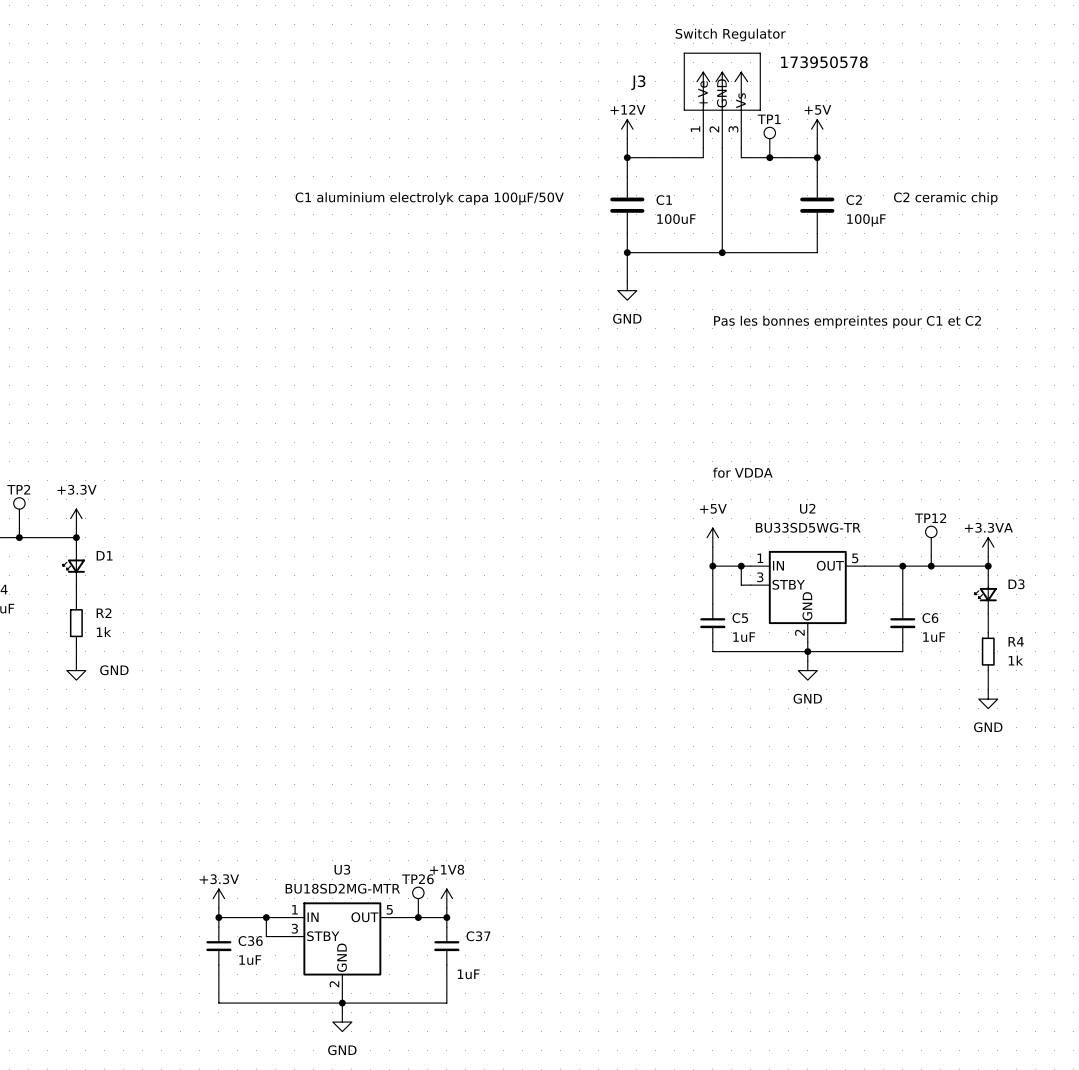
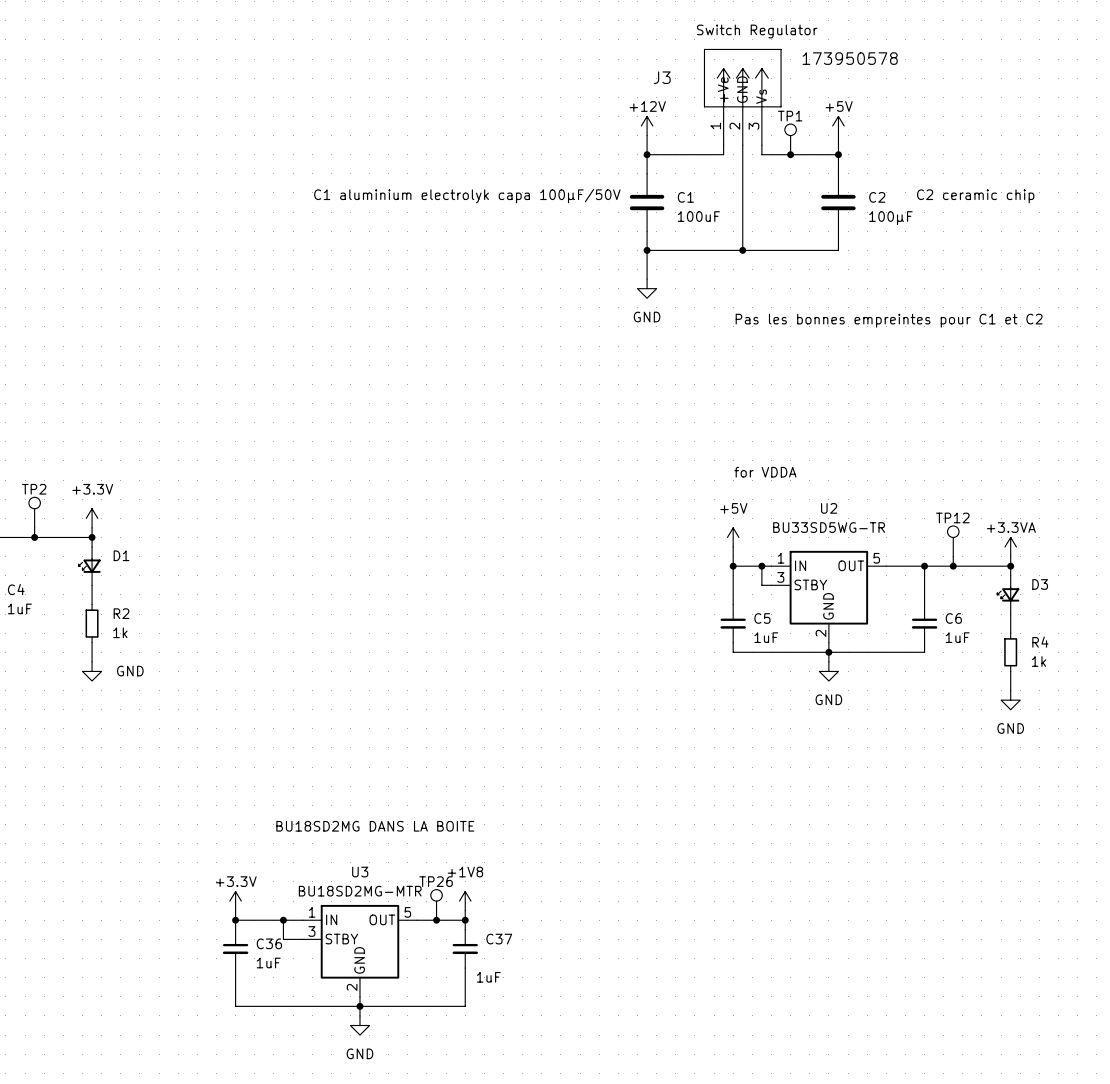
text: none -> BU18SD2MG DANS LA BOITE (375, 826)

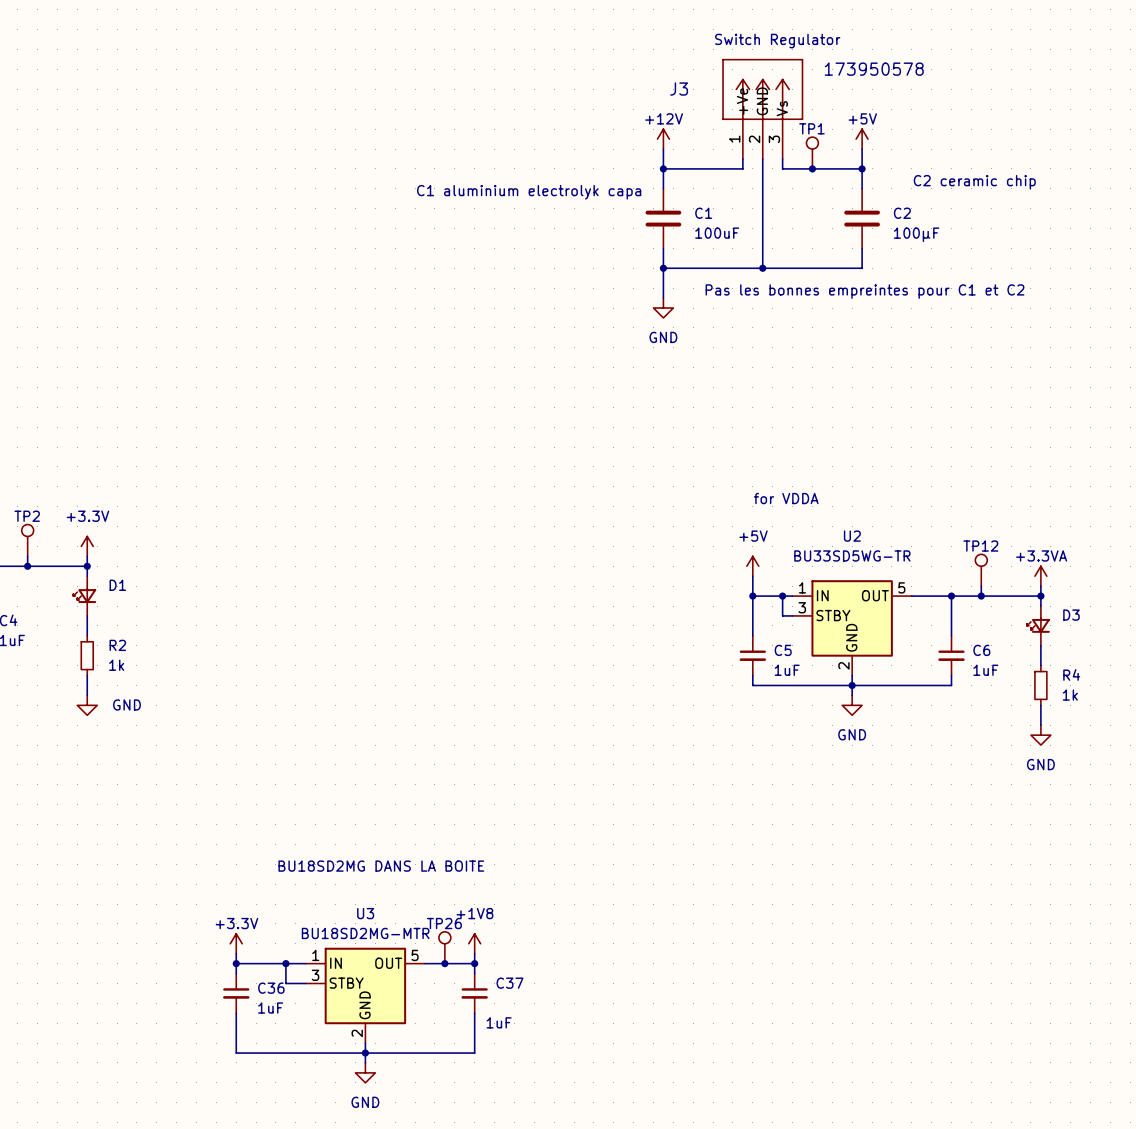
text: C1 aluminium electrolyk capa 100µF/50V (467, 196) -> C1 aluminium electrolyk capa (529, 192)
text position: C2 ceramic chip (975, 196) -> C2 ceramic chip (974, 182)
text position: Pas les bonnes empreintes pour C1 et C2 (889, 320) -> Pas les bonnes empreintes pour C1 et C2 (865, 291)

